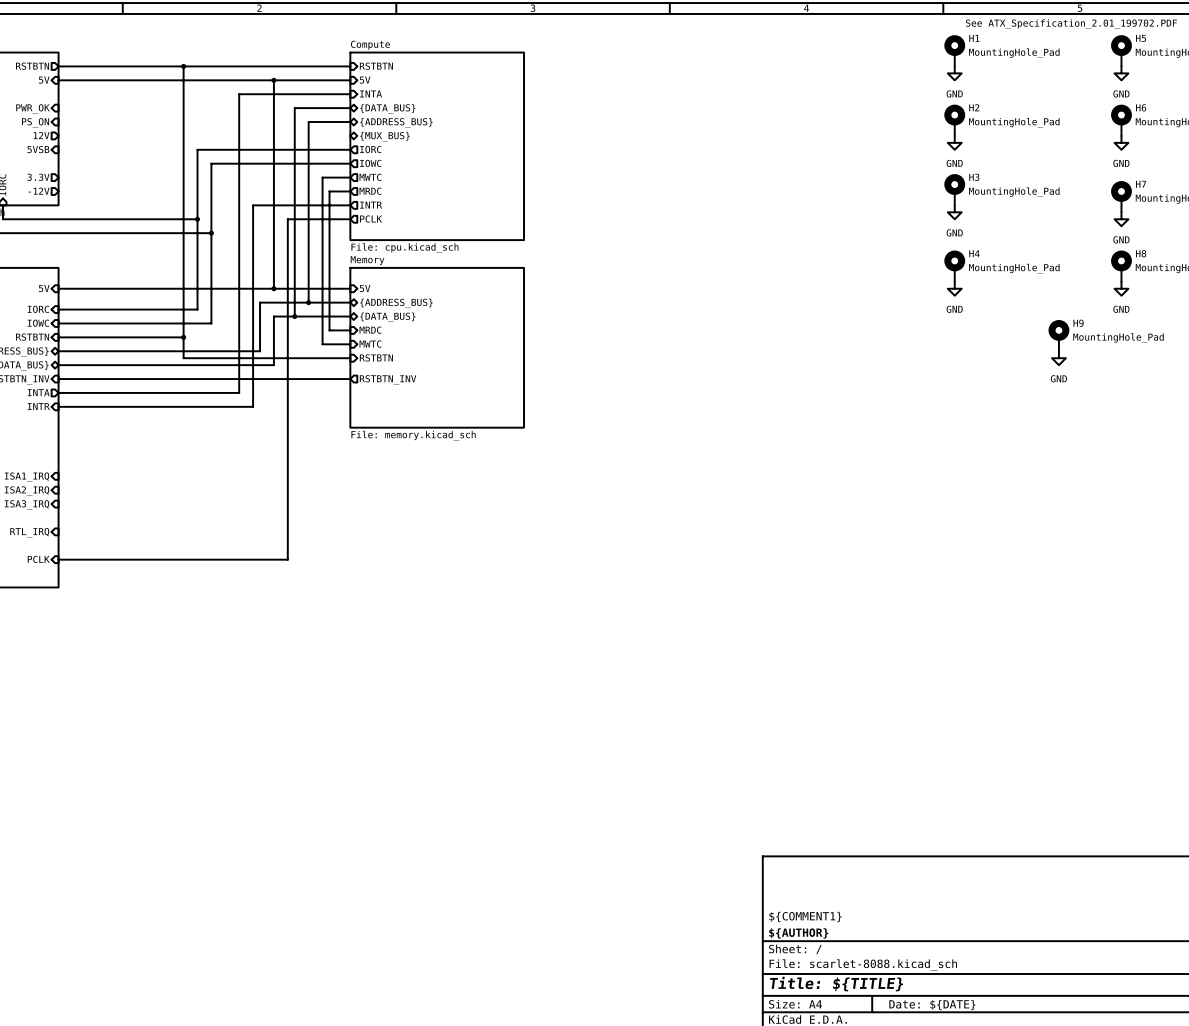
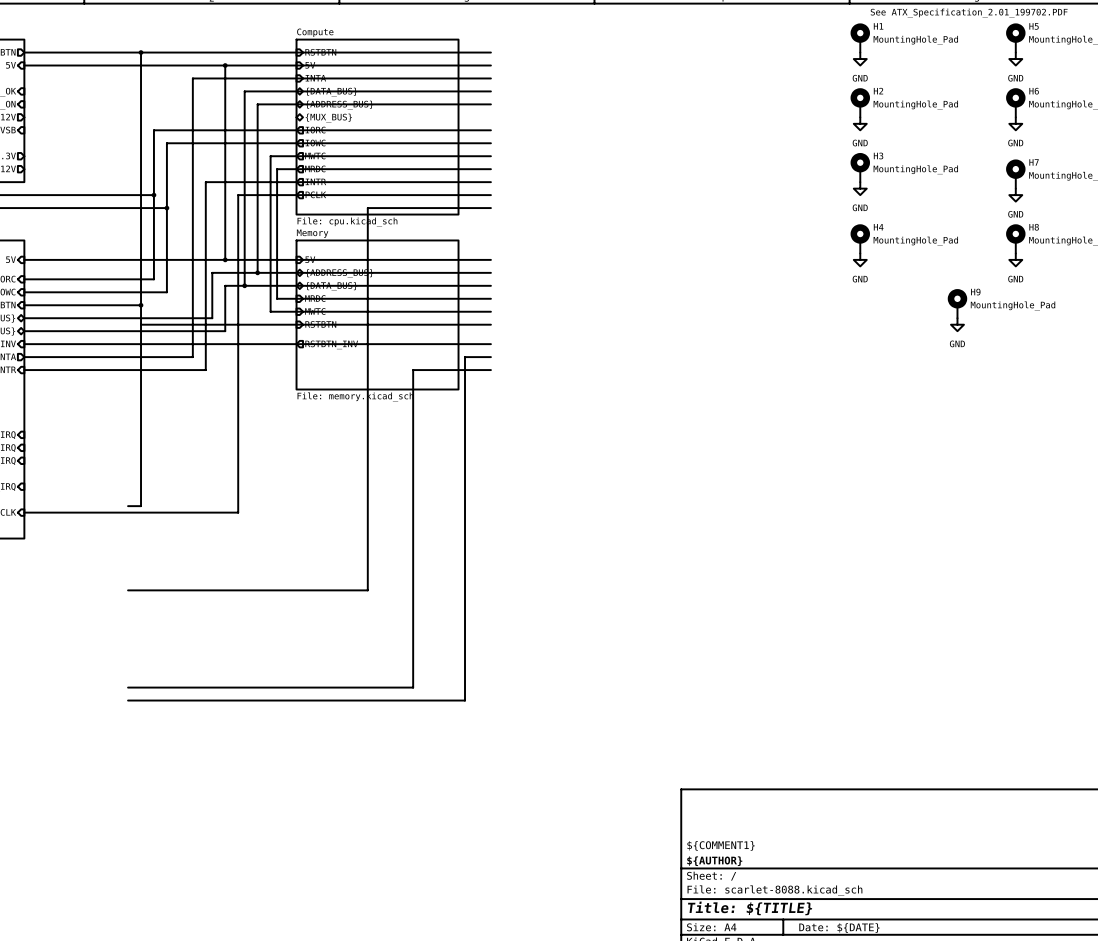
wire: none -> (296, 52) (490, 52)
wire: none -> (296, 65) (490, 65)
wire: none -> (296, 78) (490, 78)
bus: none -> (296, 91) (490, 91)
bus: none -> (296, 104) (490, 104)
wire: none -> (296, 130) (490, 130)
wire: none -> (296, 143) (490, 143)
wire: none -> (296, 156) (490, 156)
wire: none -> (296, 169) (490, 169)
wire: none -> (296, 182) (490, 182)
wire: none -> (296, 195) (490, 195)
wire: none -> (490, 208) (367, 208) (367, 590) (128, 590)
wire: none -> (296, 259) (490, 259)
bus: none -> (296, 272) (490, 272)
bus: none -> (296, 285) (490, 285)
wire: none -> (296, 298) (490, 298)
wire: none -> (296, 311) (490, 311)
wire: none -> (141, 324) (141, 506) (128, 506)
wire: none -> (296, 324) (490, 324)
wire: none -> (296, 344) (490, 344)
wire: none -> (490, 357) (465, 357) (465, 700) (128, 700)
wire: none -> (490, 370) (413, 370) (413, 687) (128, 687)

